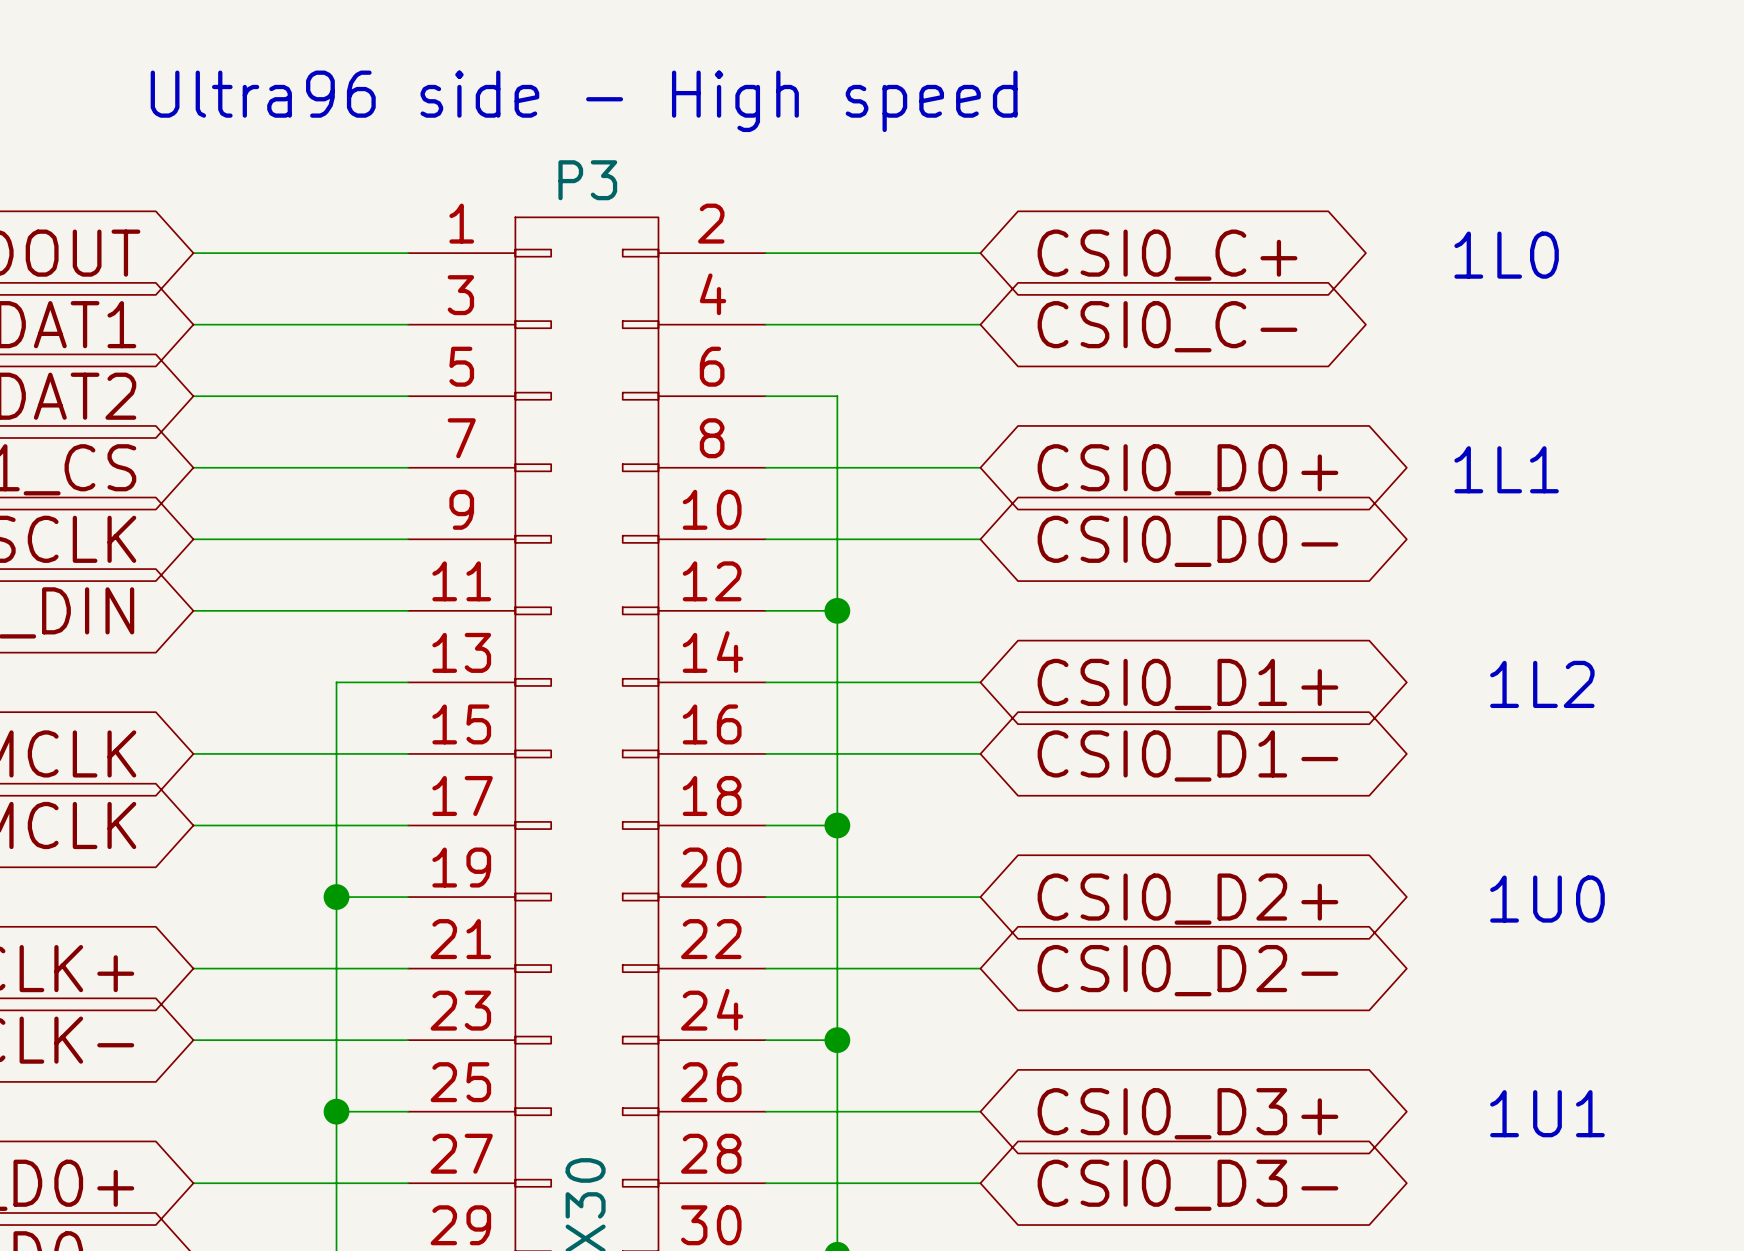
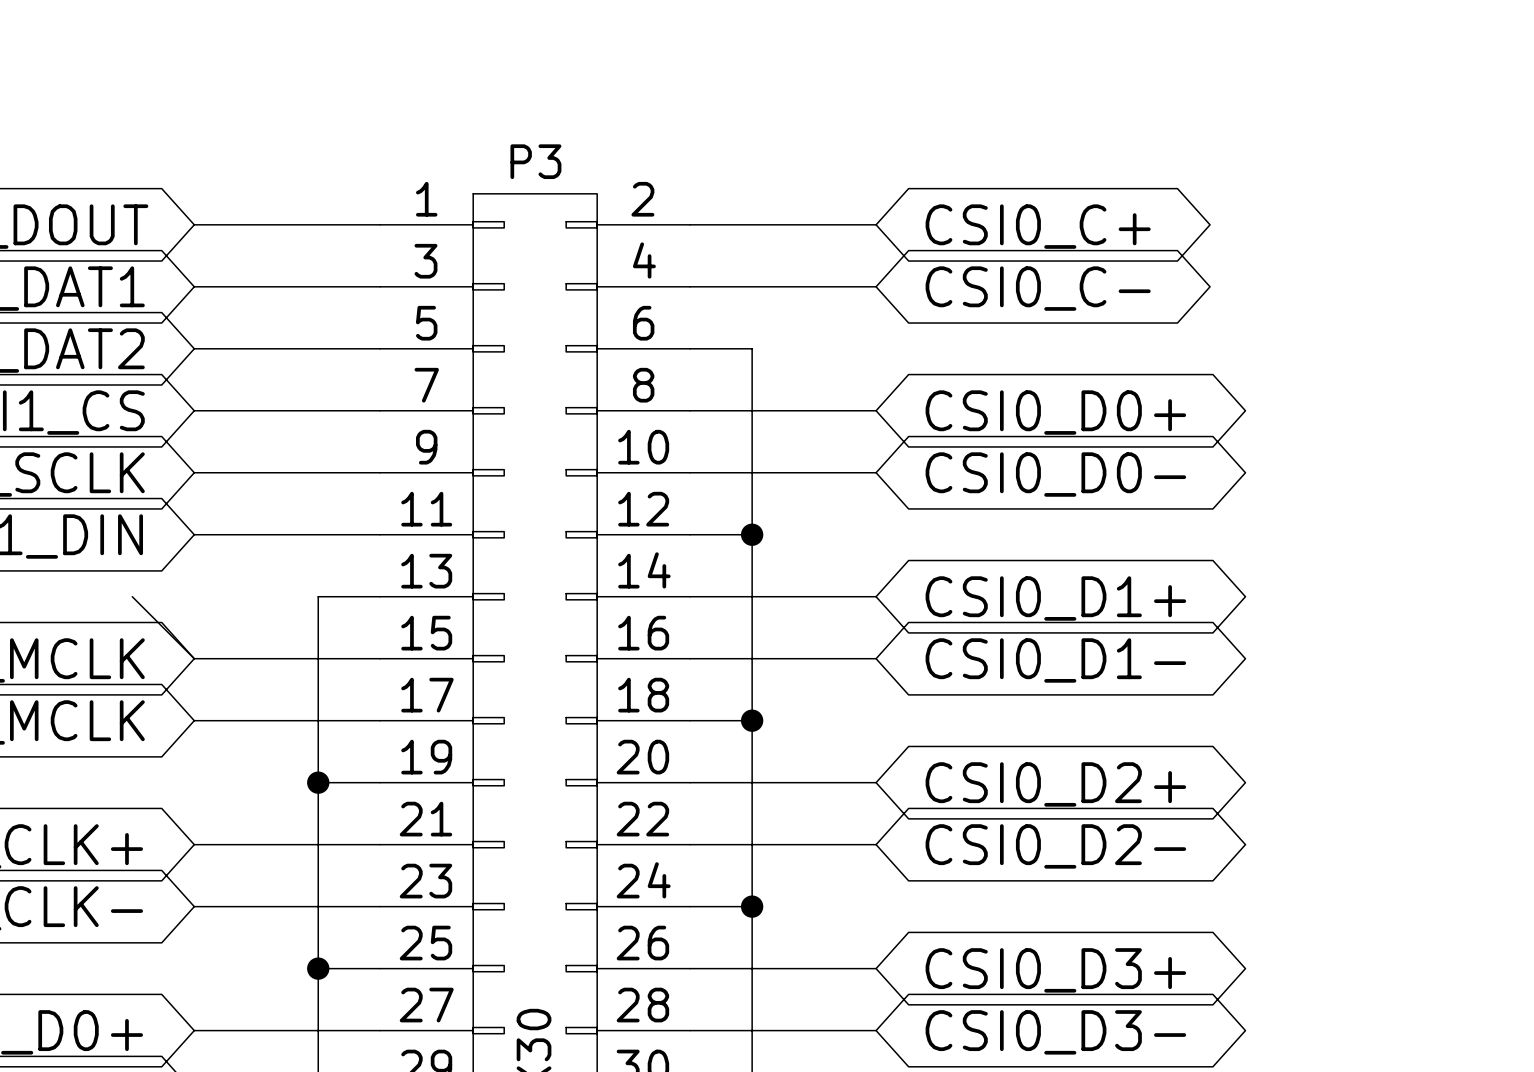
text: Ultra96 side - High speed (584, 101) -> none
text: 1L0 (1506, 255) -> none
text: 1L1 (1506, 469) -> none
bus: none -> (132, 596) (194, 658)
text: 1L2 (1542, 684) -> none
text: 1U0 (1547, 899) -> none
text: 1U1 (1547, 1113) -> none

